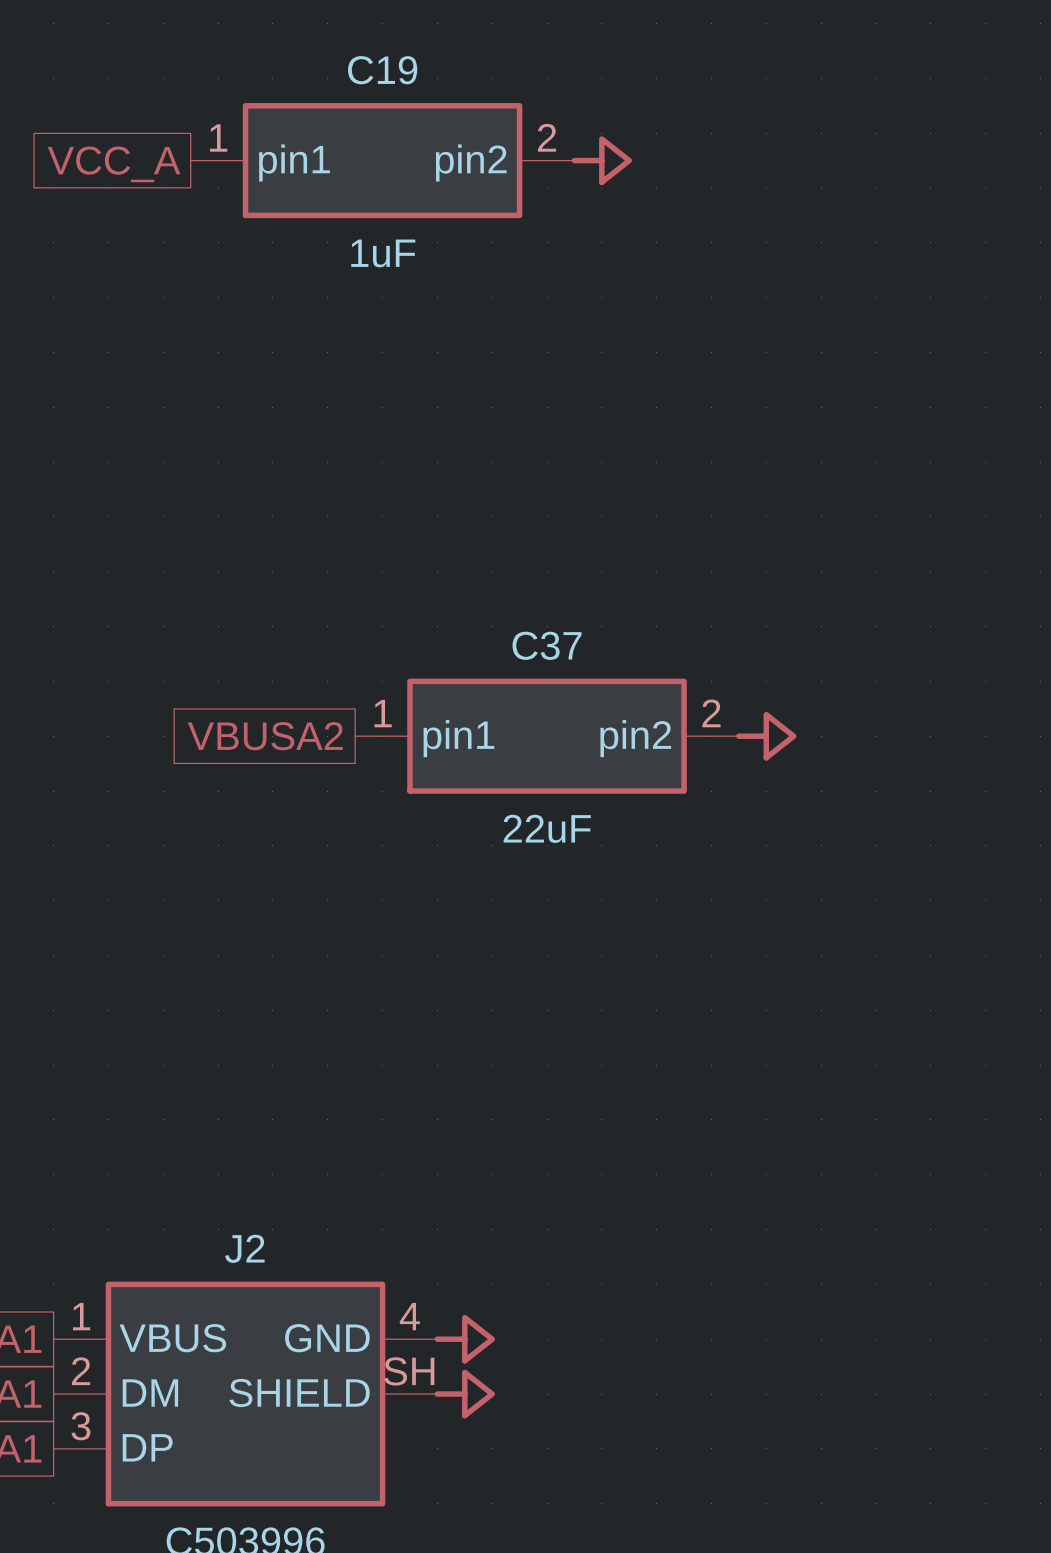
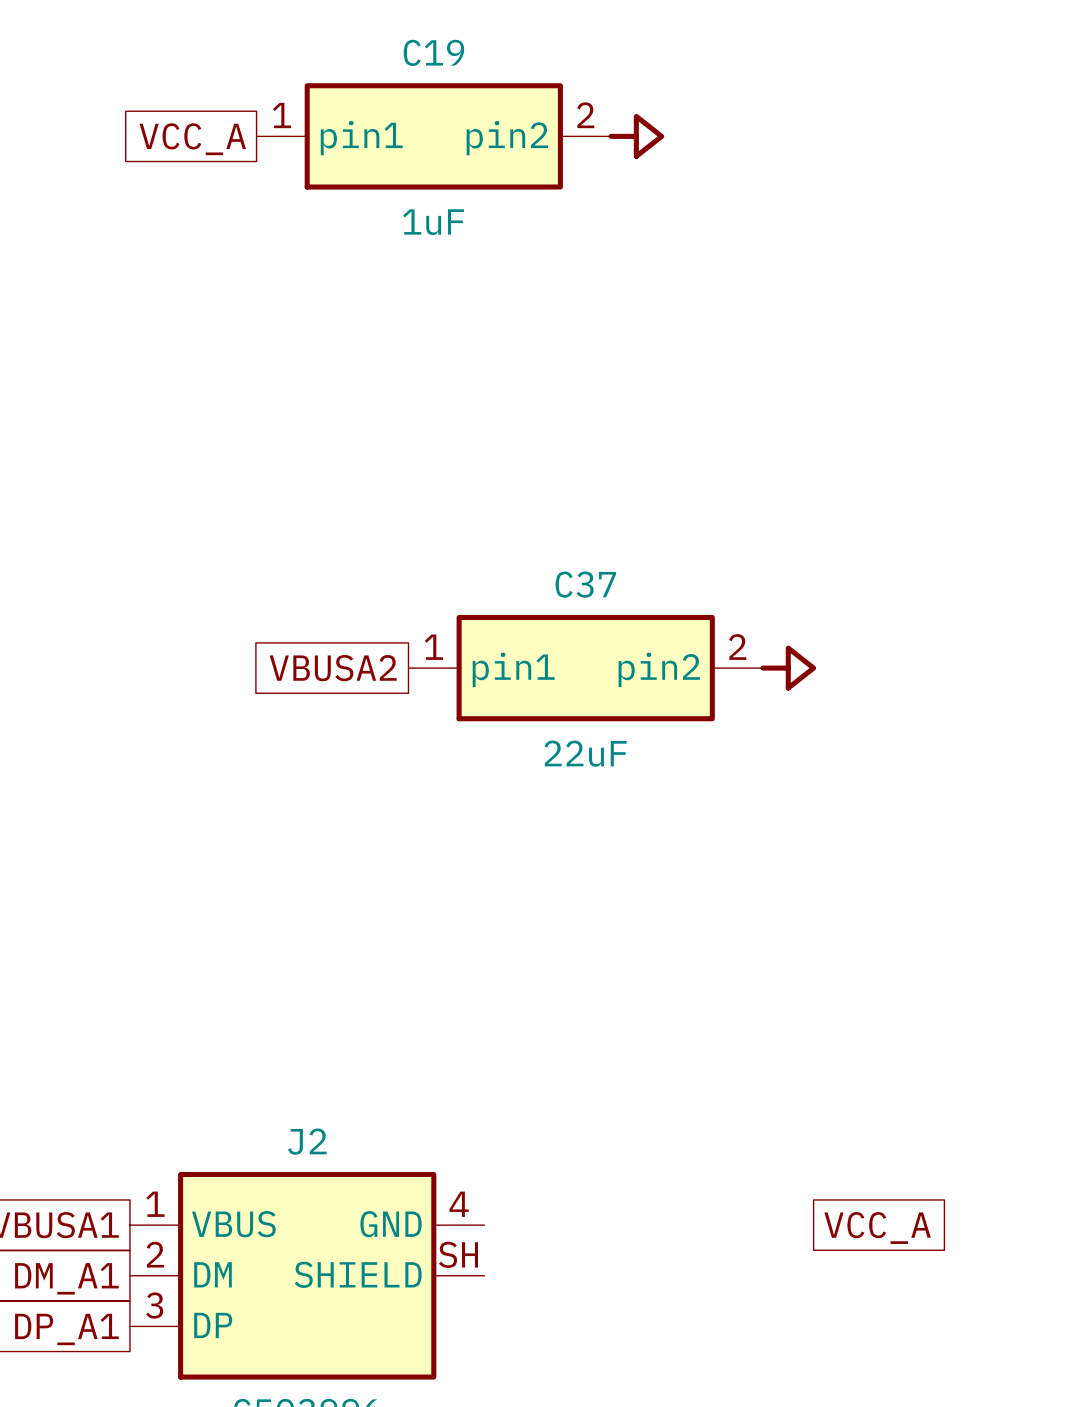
power symbol: (464, 1339) -> none
global label: none -> VCC_A (877, 1227)
power symbol: (464, 1394) -> none

